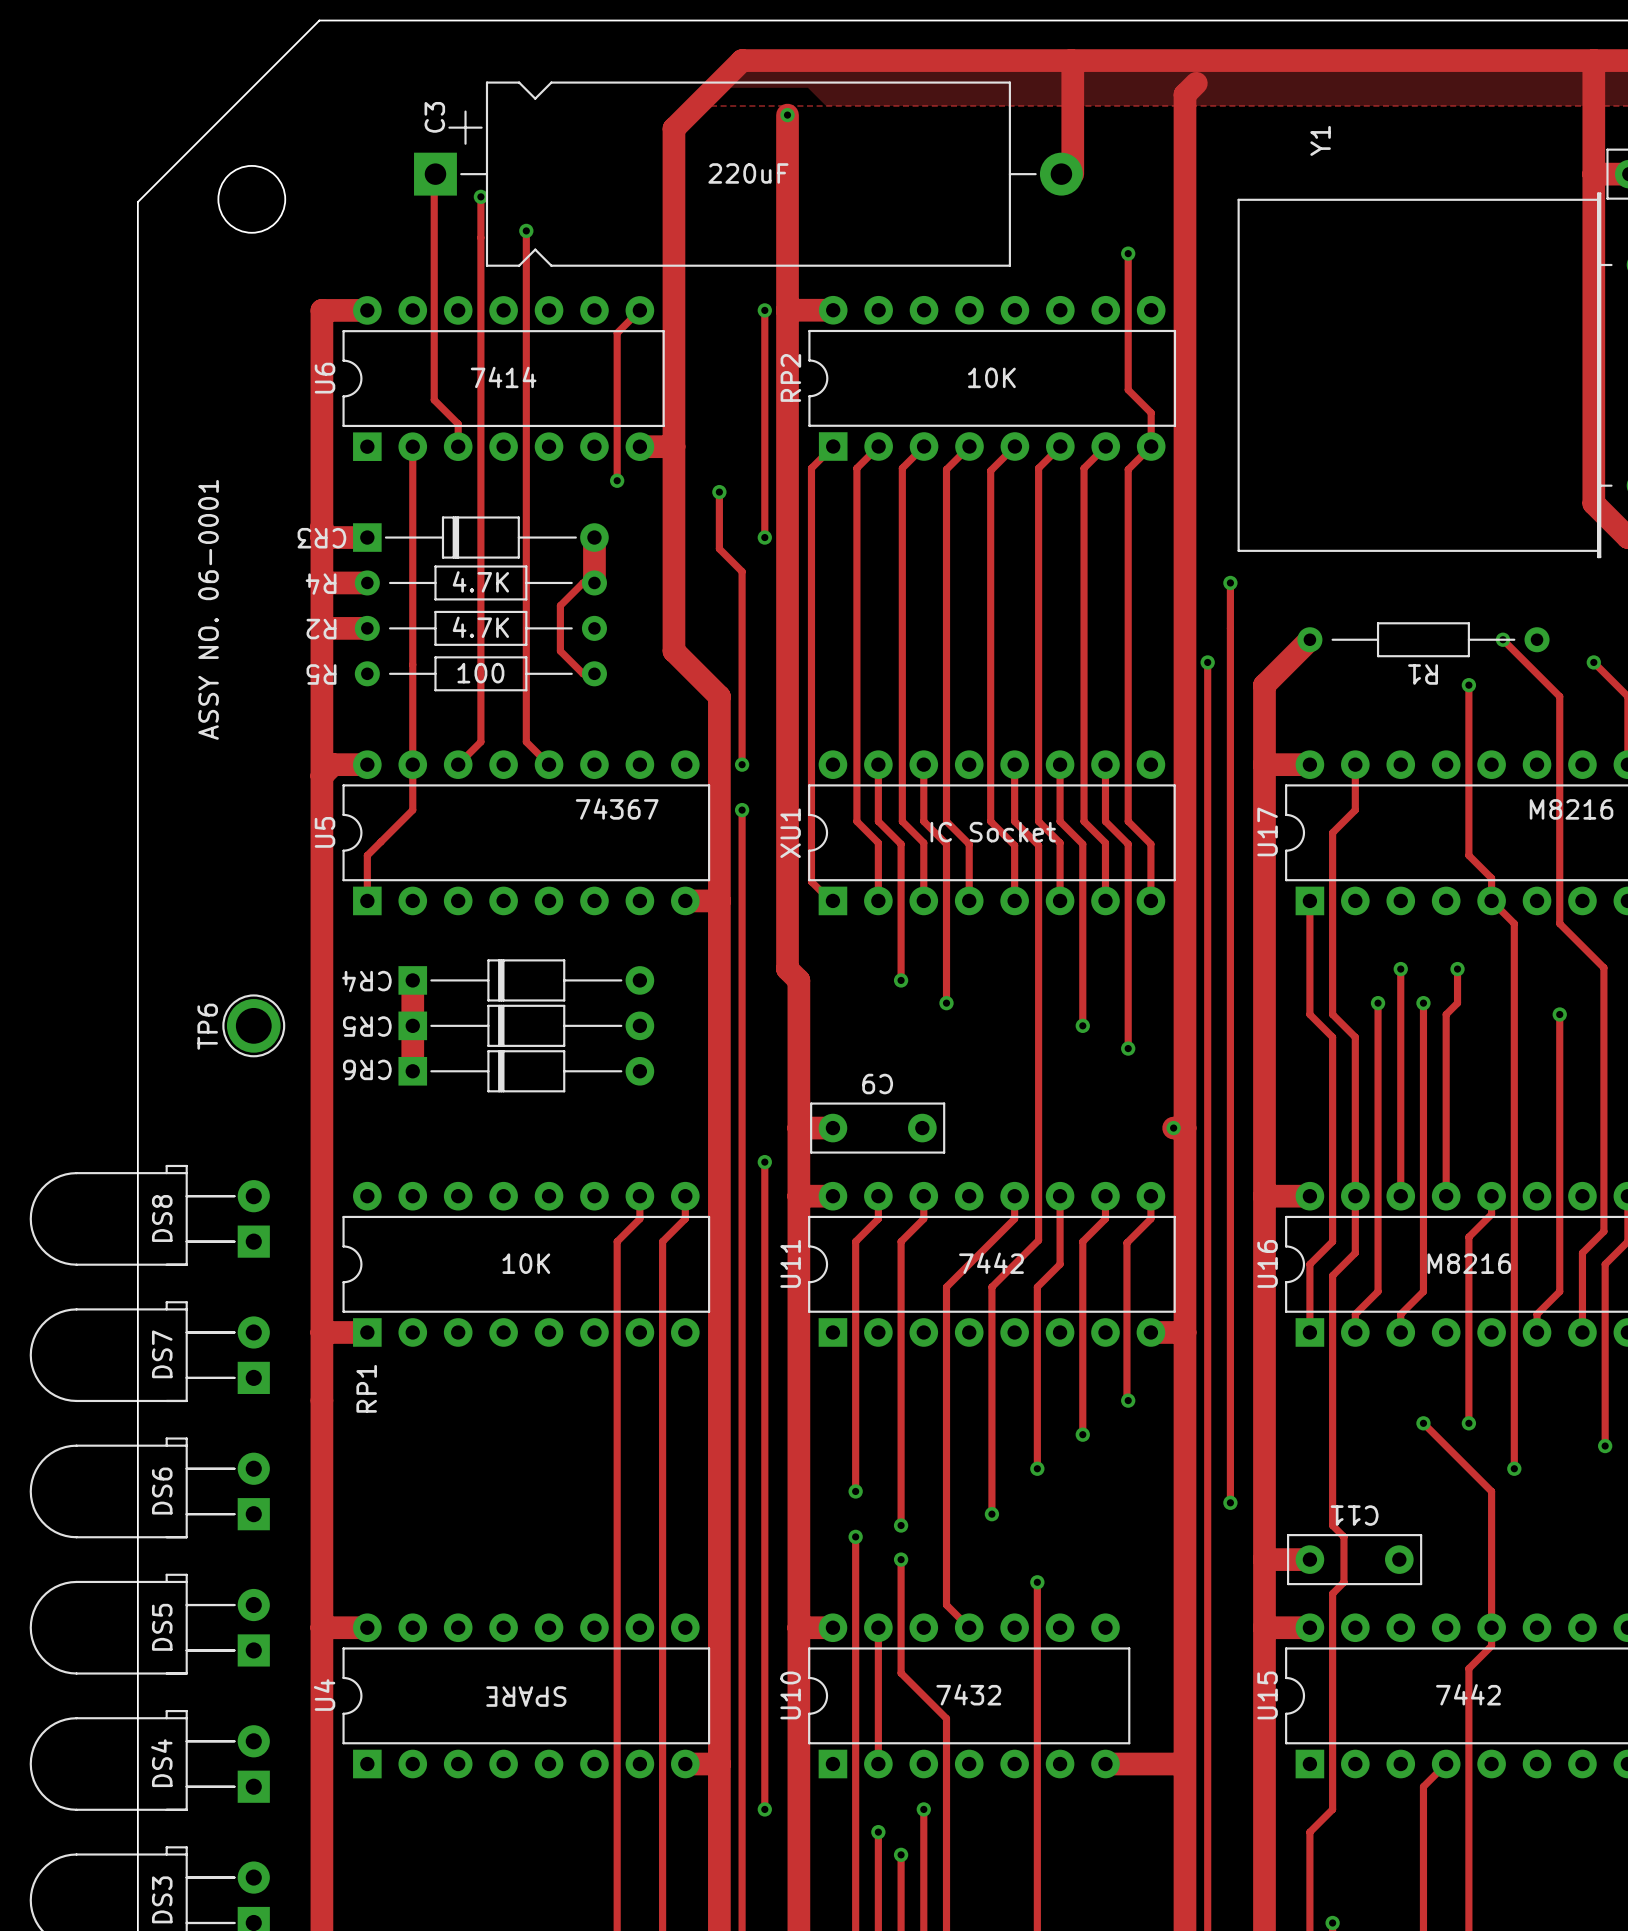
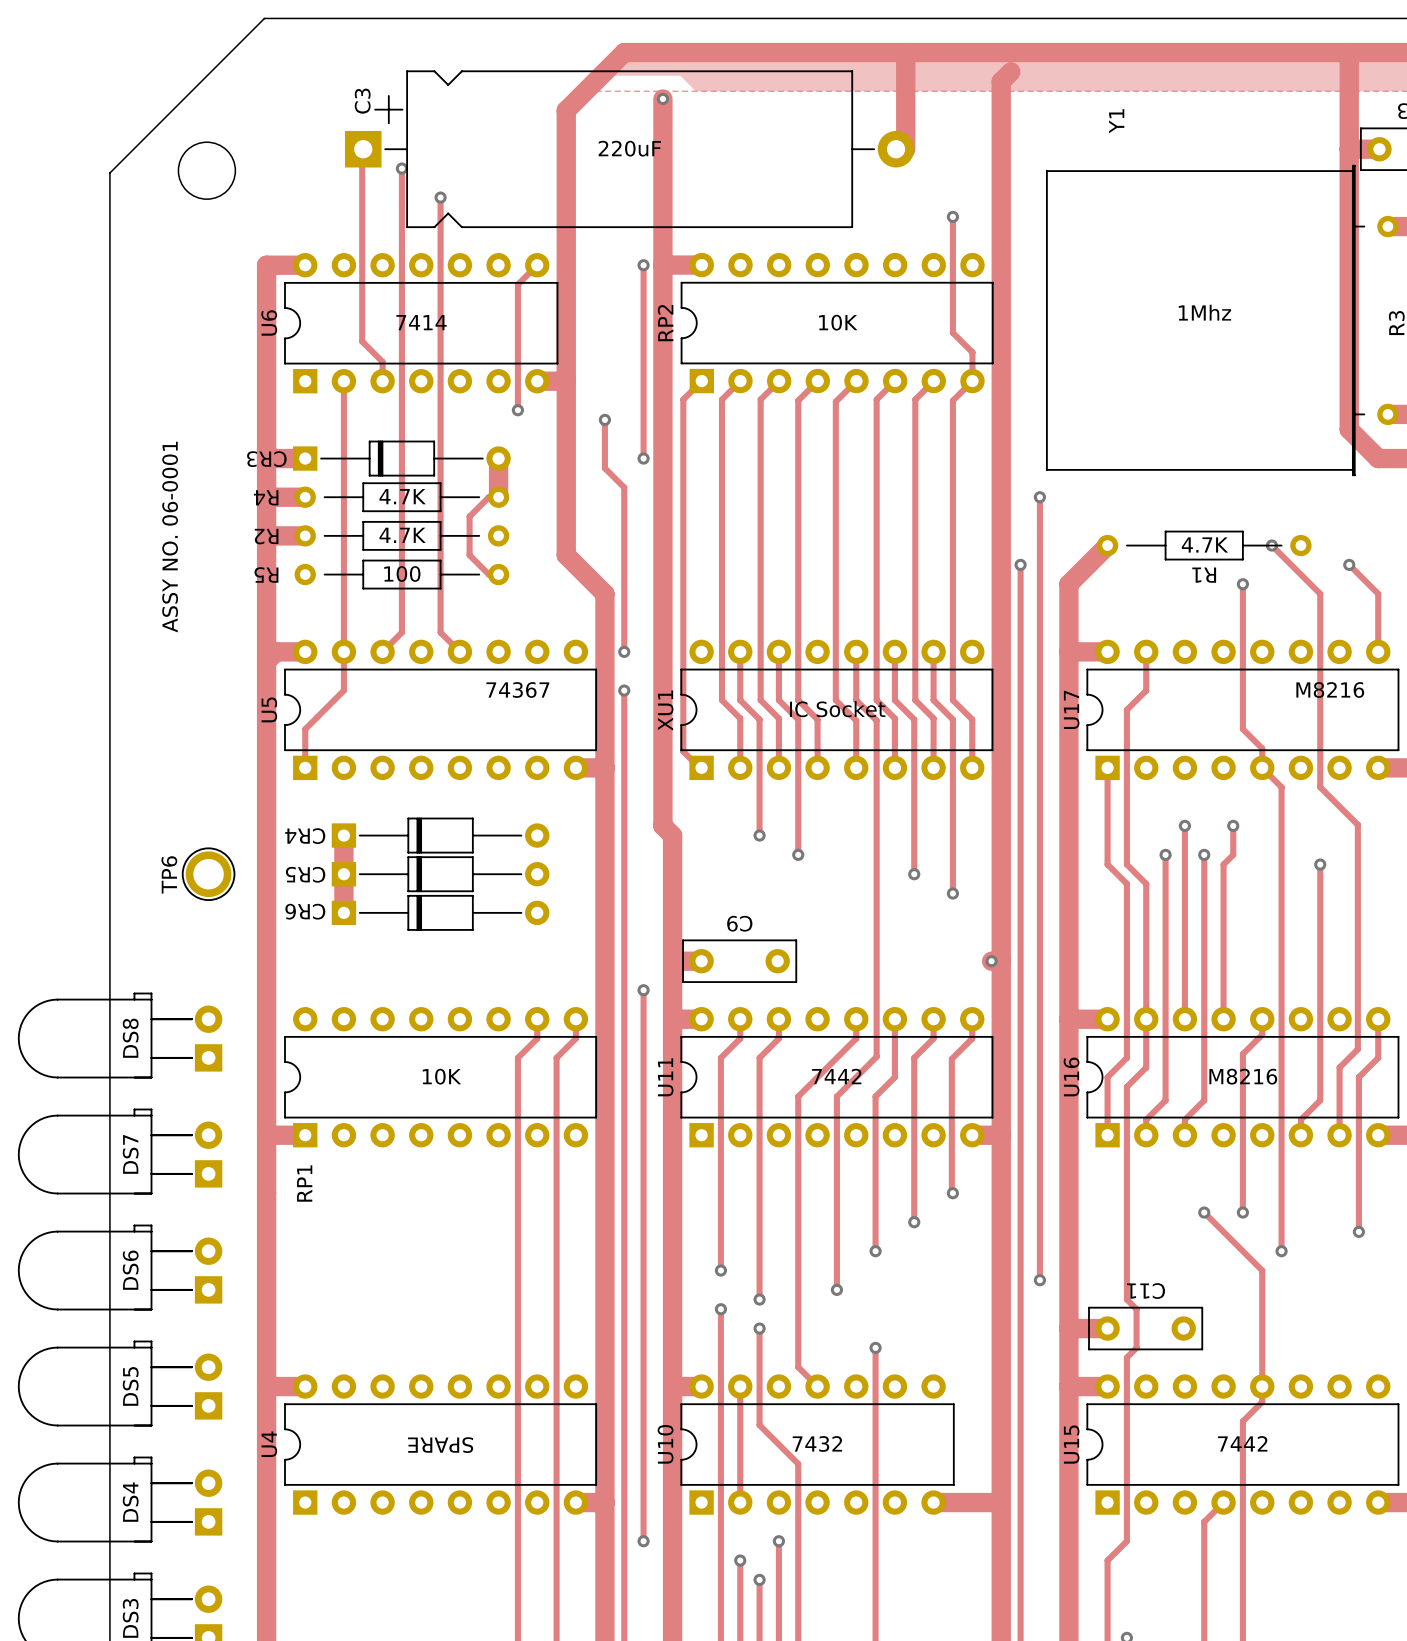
Y1 value: none -> 1Mhz (1204, 312)
R1 value: none -> 4.7K (1204, 544)

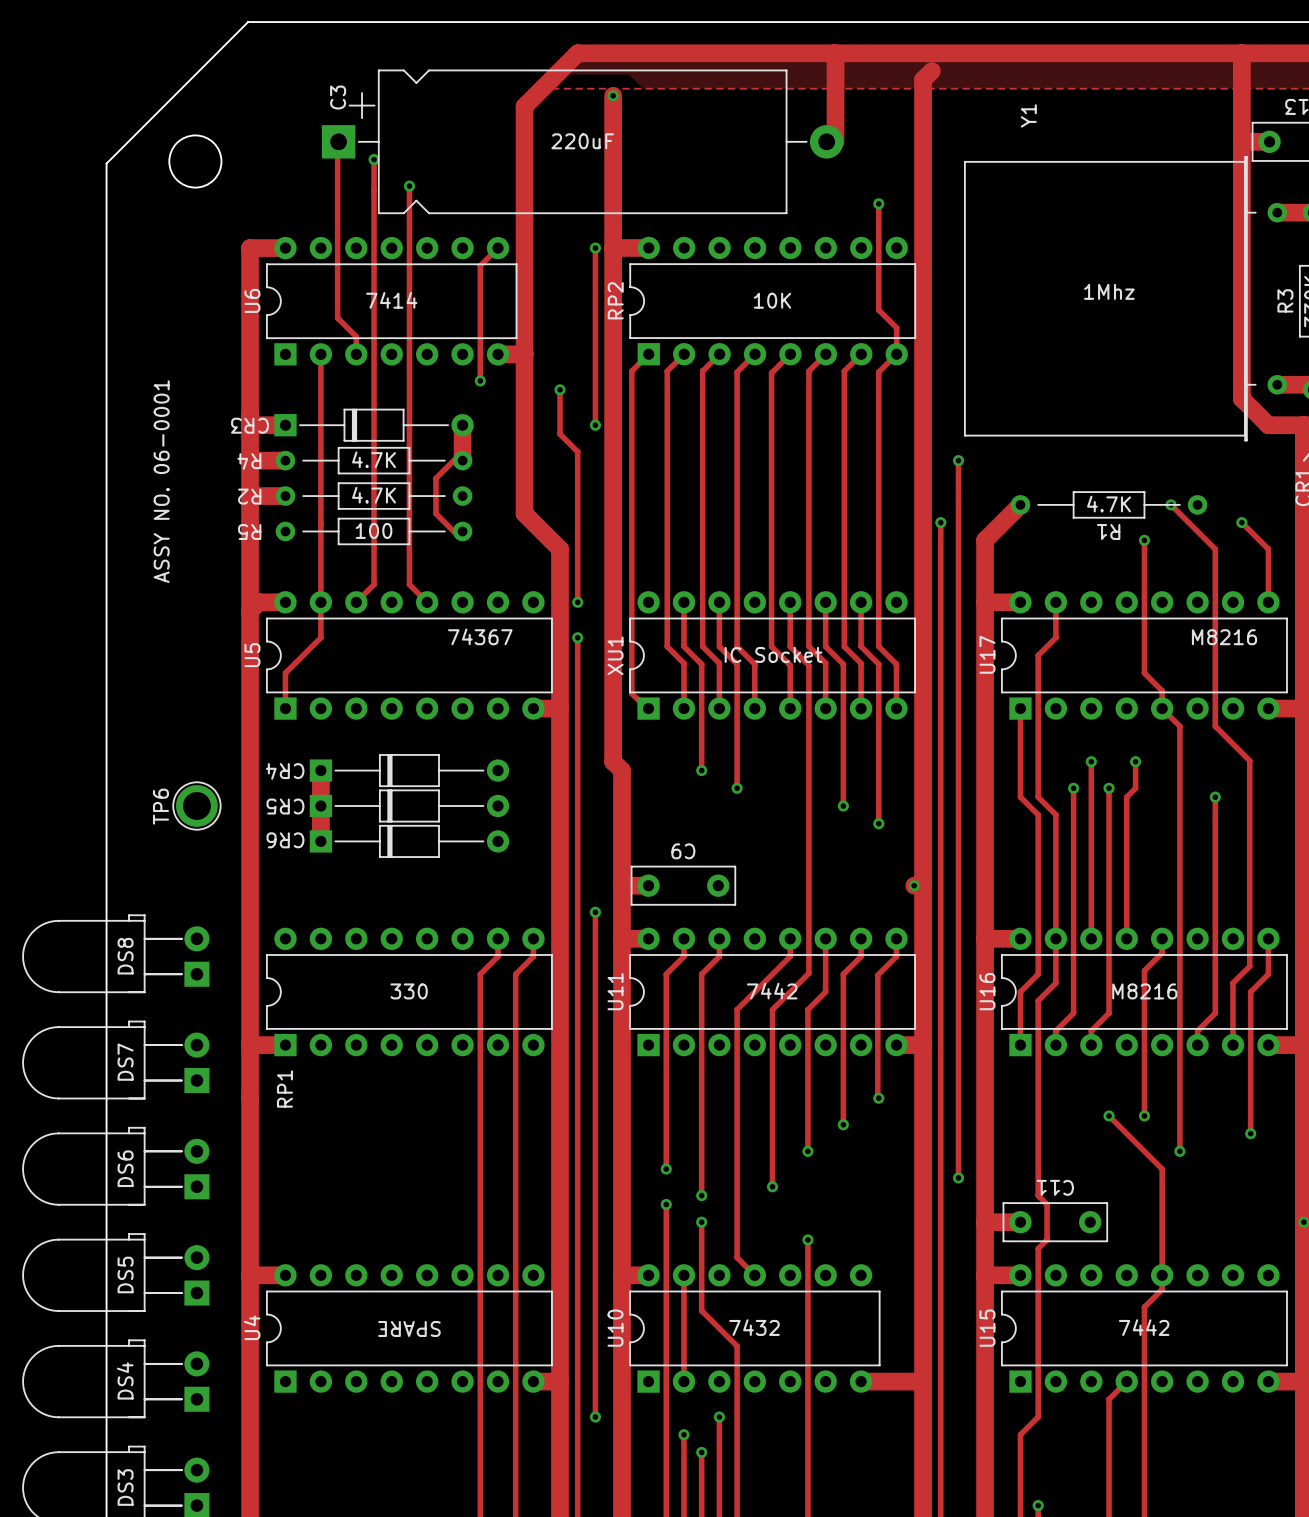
RP1 value: 10K (441, 1076) -> 330 (409, 991)

